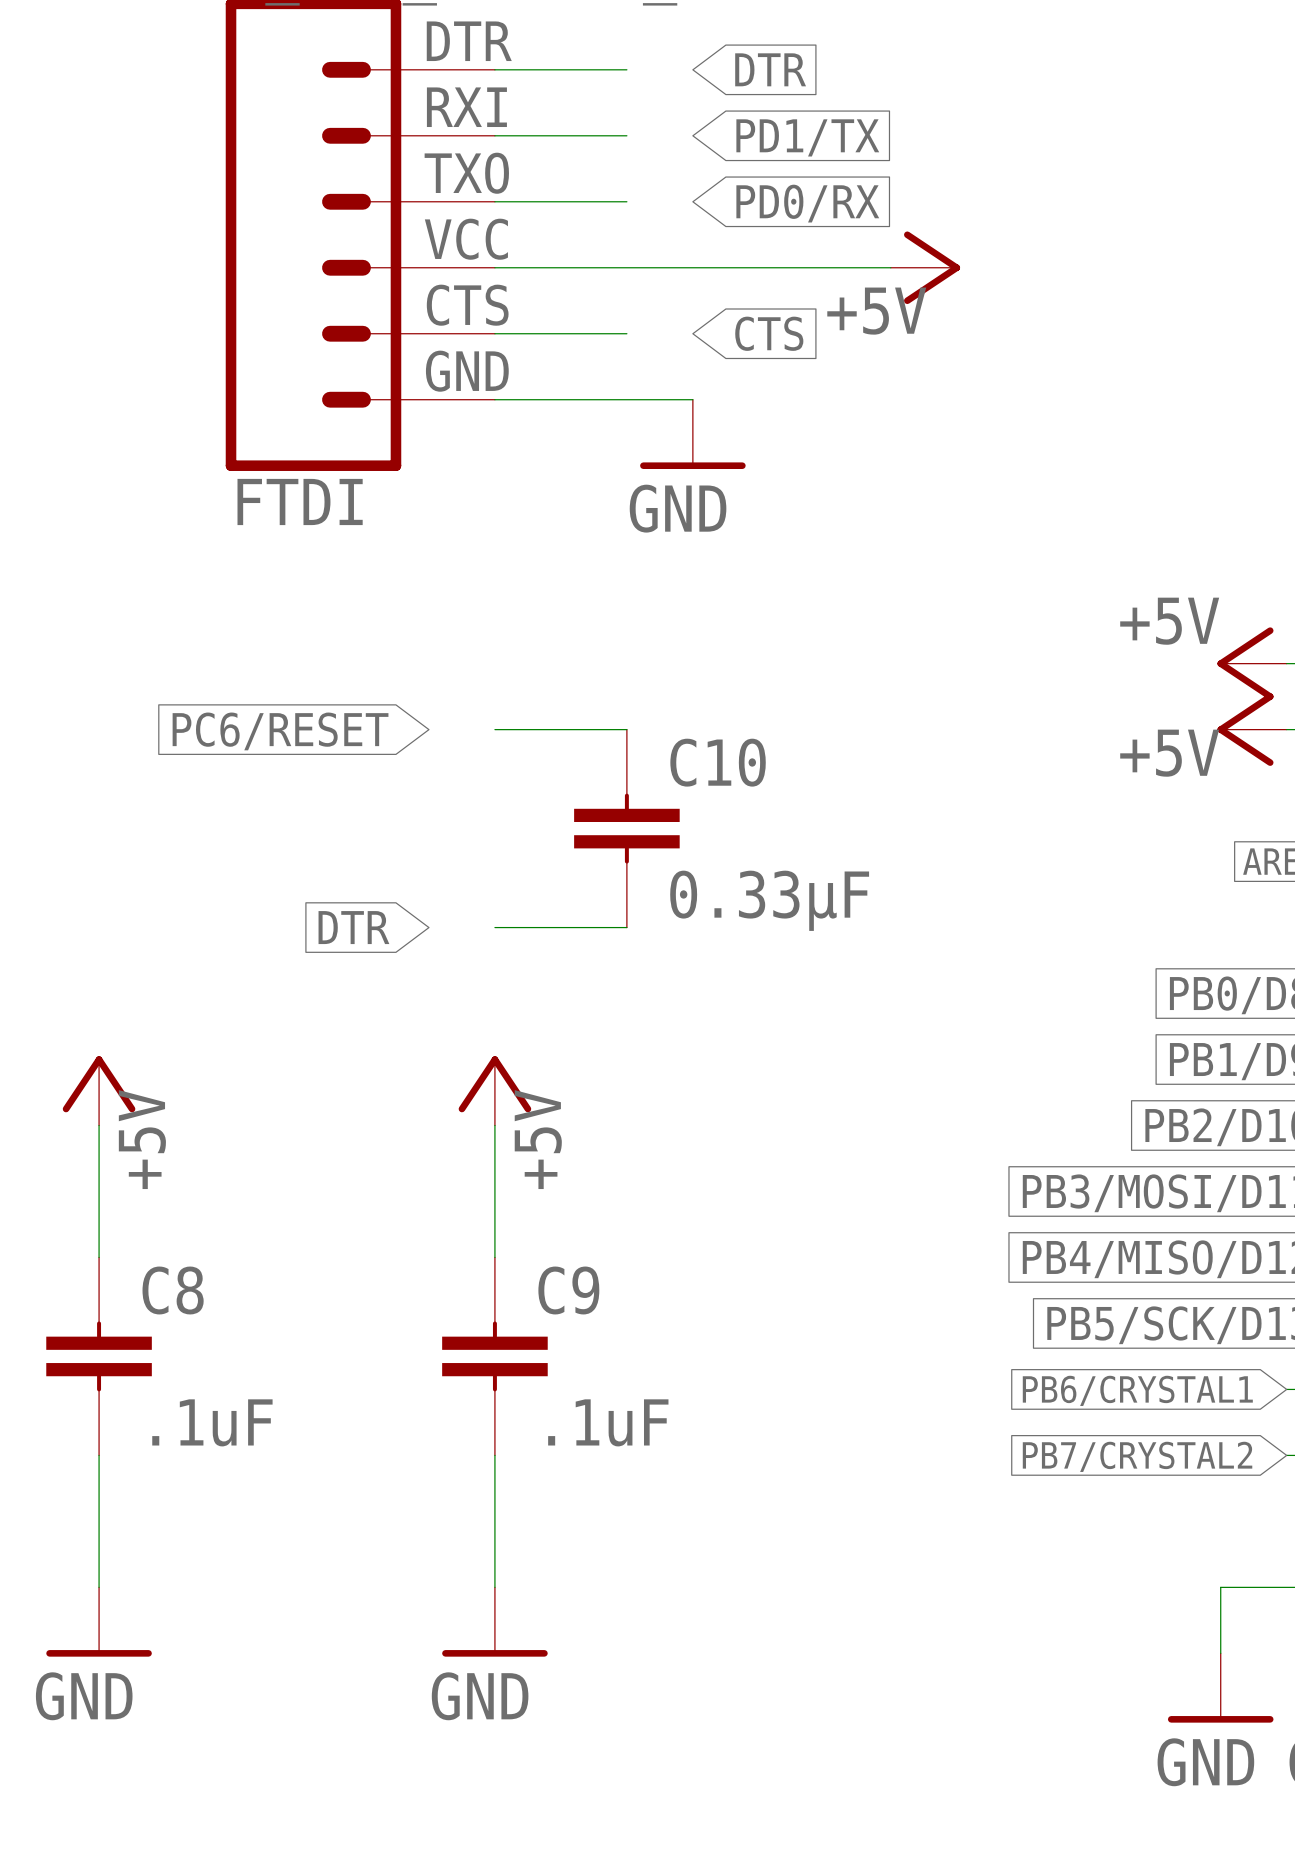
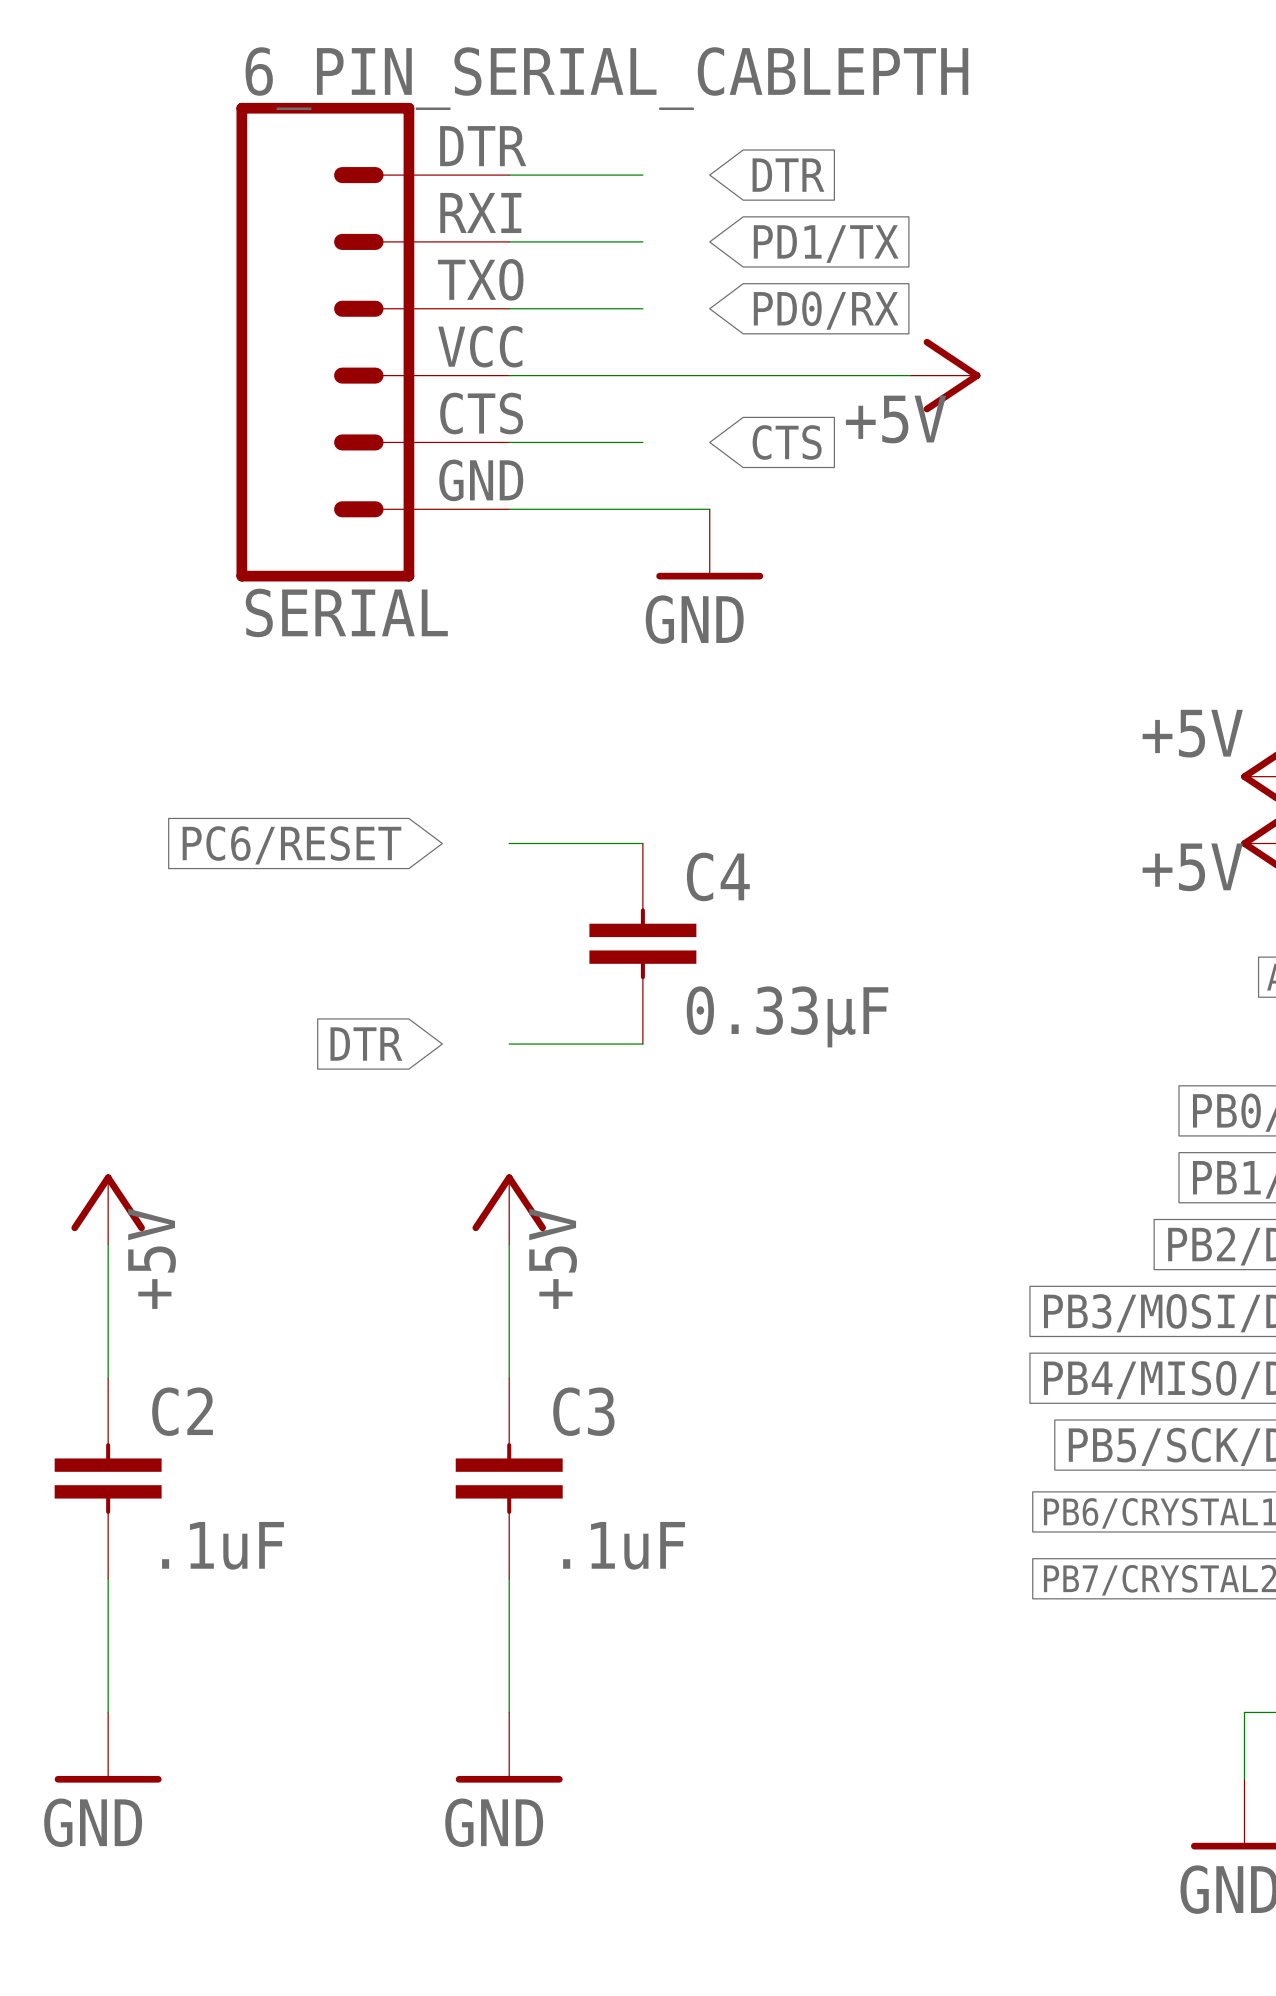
FTDI name: FTDI (300, 501) -> SERIAL (346, 612)
C10 name: C10 (718, 762) -> C4 (718, 876)
C8 name: C8 (173, 1290) -> C2 (182, 1411)
C9 name: C9 (568, 1290) -> C3 (583, 1411)

